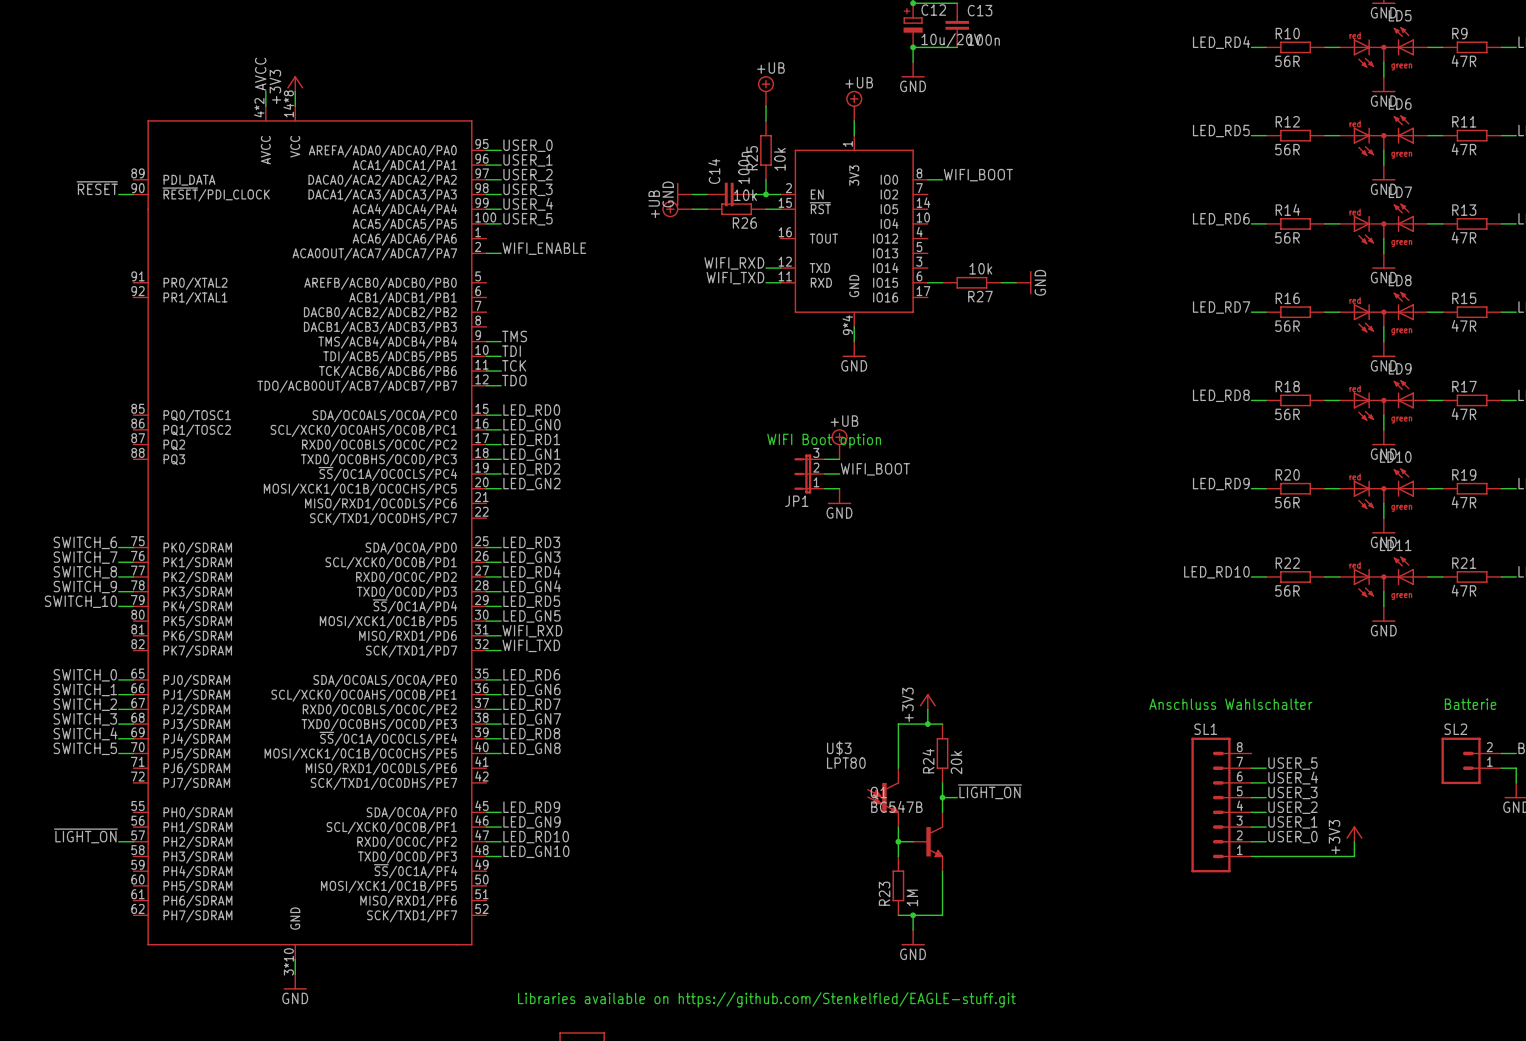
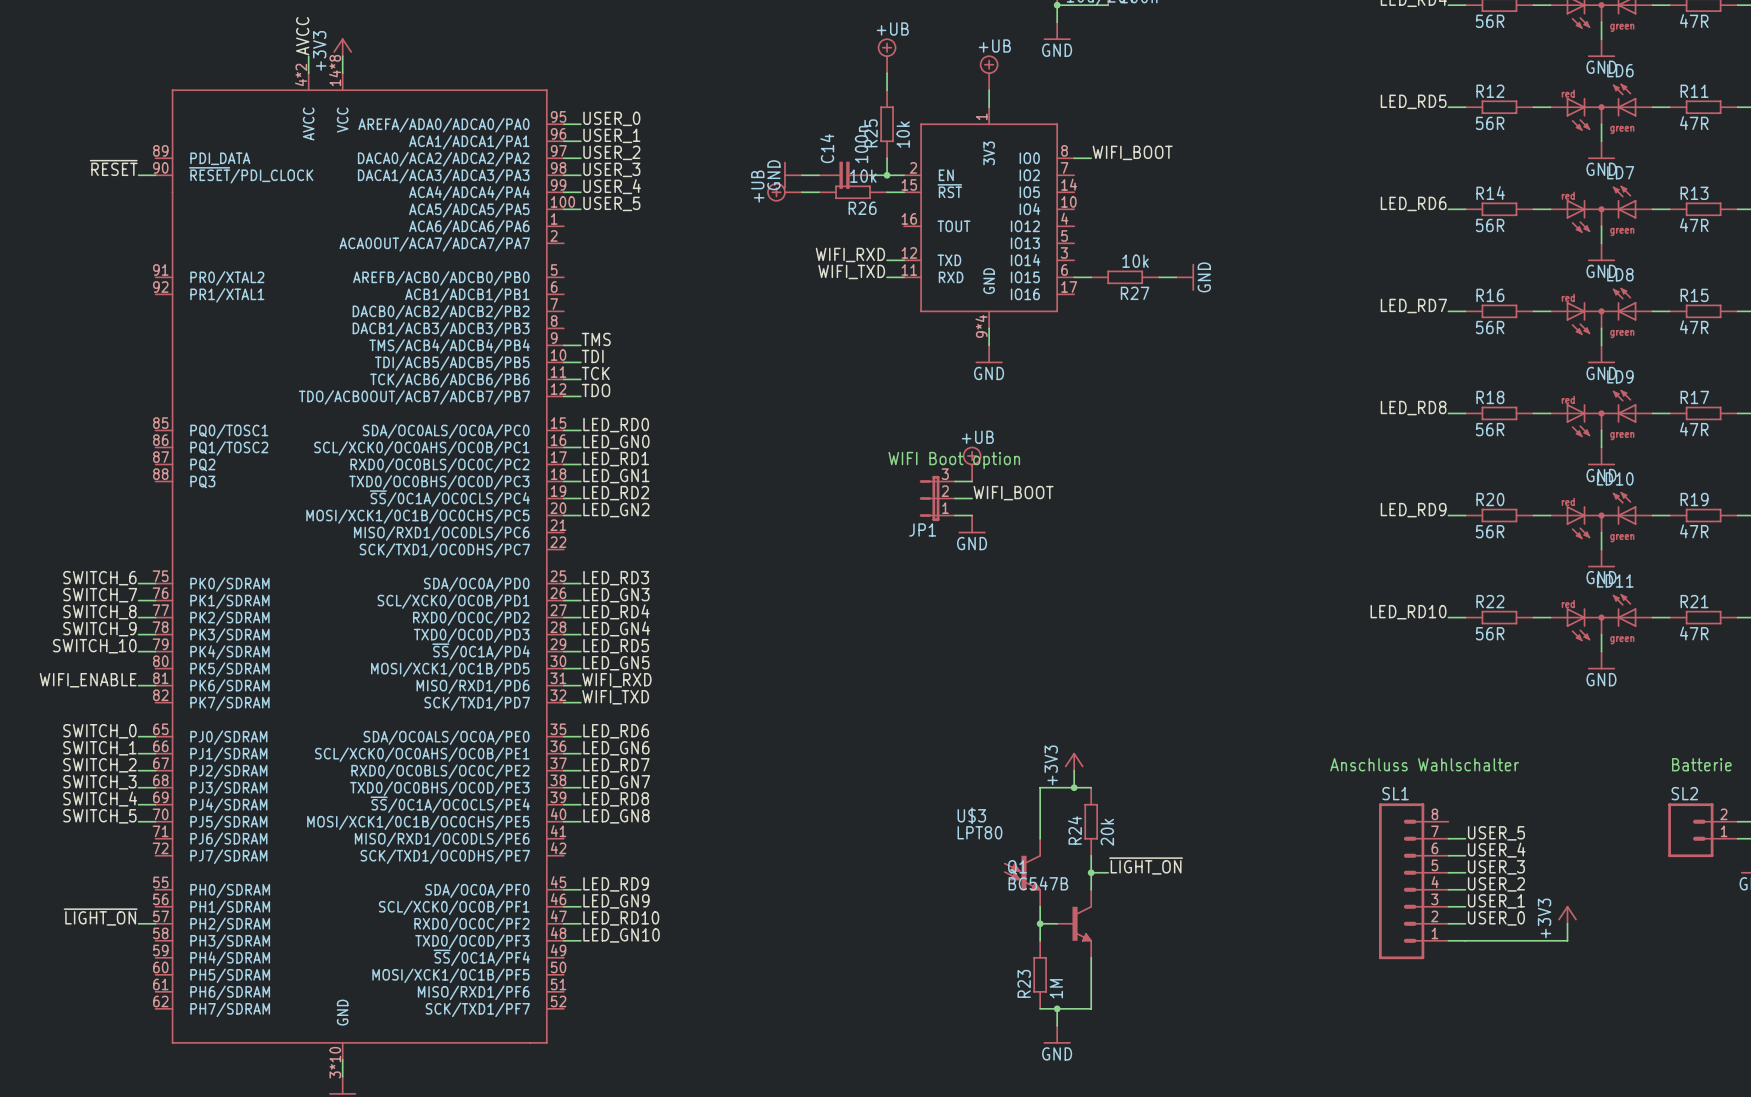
label: WIFI_ENABLE (544, 248) -> none
wire: (486, 253) (501, 253) -> none
label: none -> WIFI_ENABLE (88, 680)
wire: none -> (138, 685) (155, 685)

